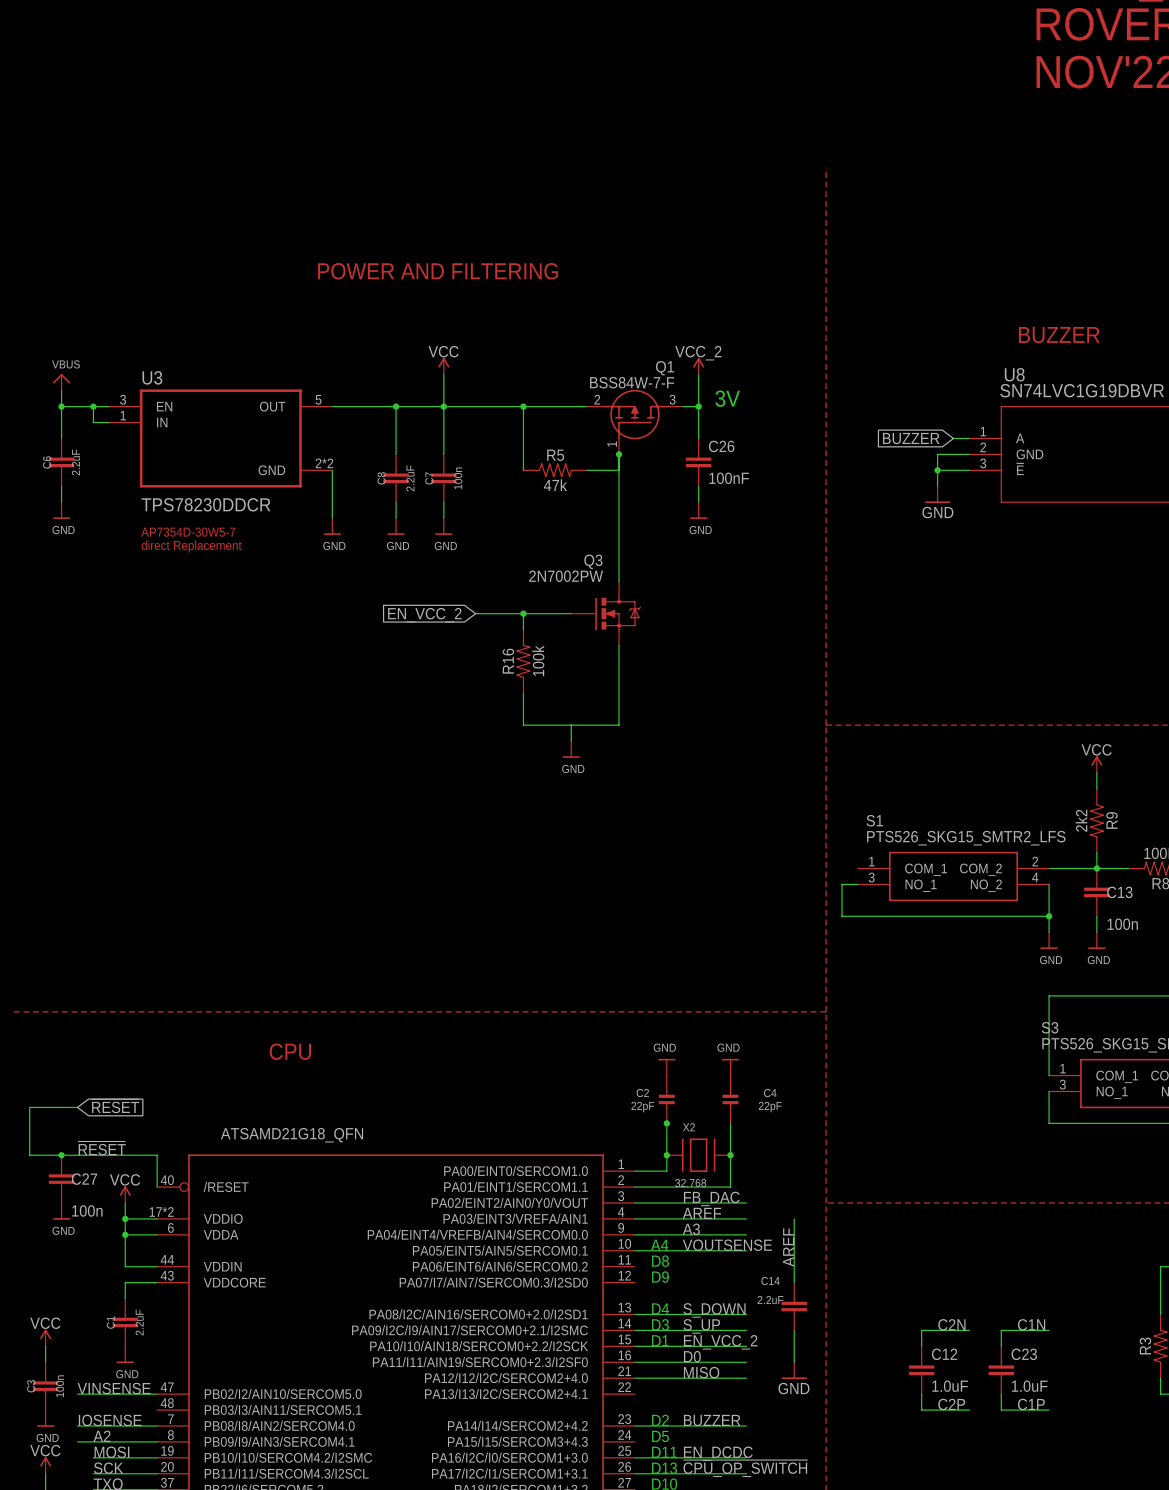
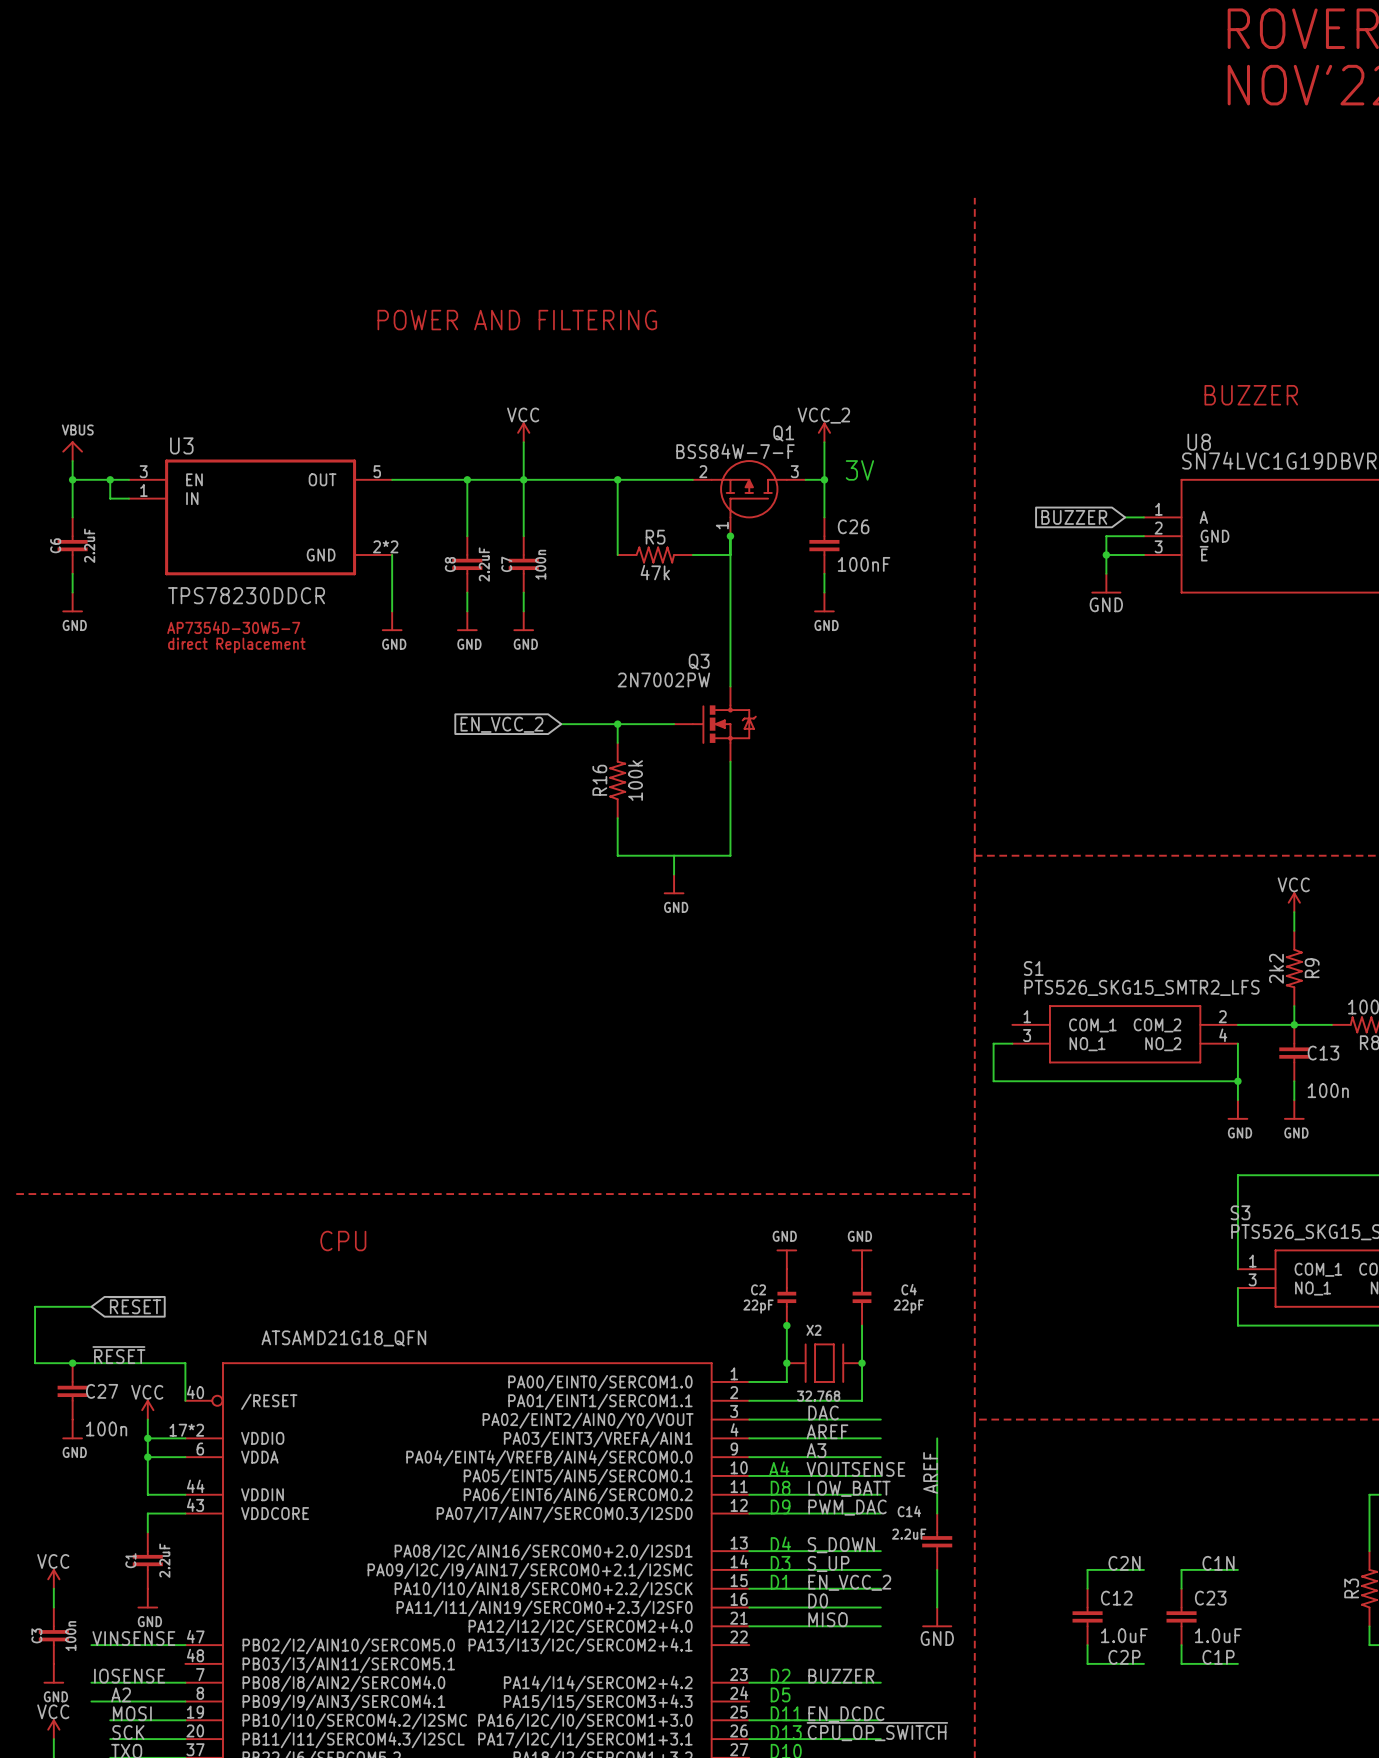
label: FB_DAC (711, 1198) -> DAC (823, 1412)
label: none -> LOW_BATT (849, 1488)
wire: none -> (749, 1494) (880, 1494)
label: none -> PWM_DAC (847, 1507)
wire: none -> (749, 1513) (880, 1513)

